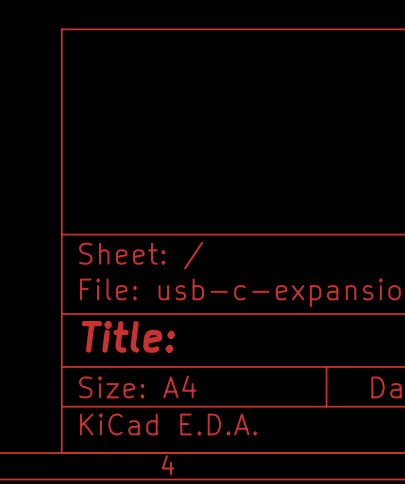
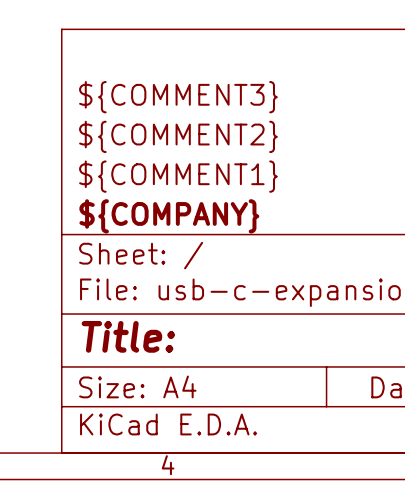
title block: none -> ${COMMENT3} (178, 97)
title block: none -> ${COMMENT2} (178, 136)
title block: none -> ${COMMENT1} (178, 176)
title block: none -> ${COMPANY} (169, 216)

